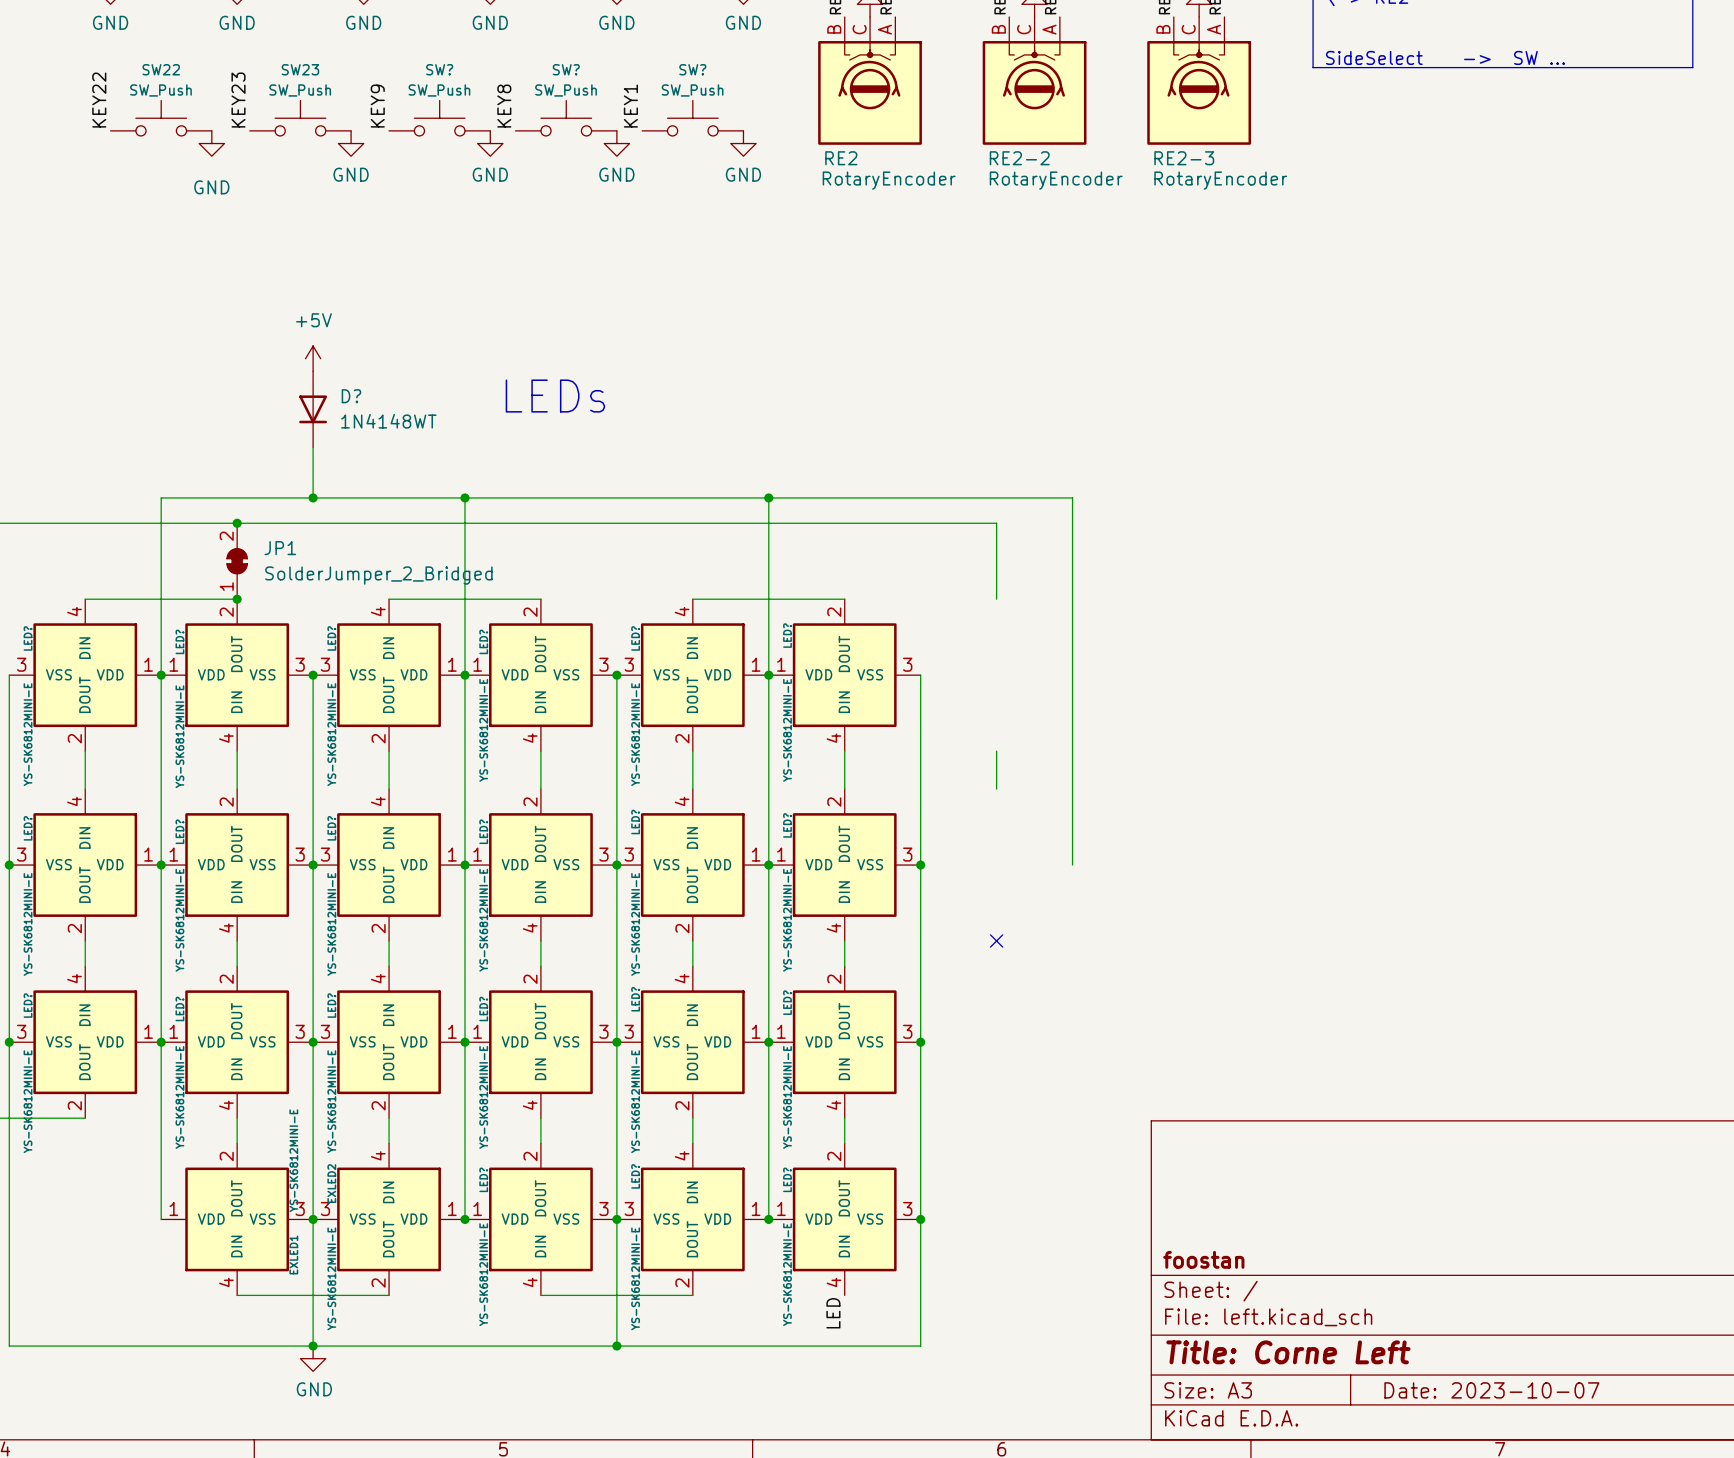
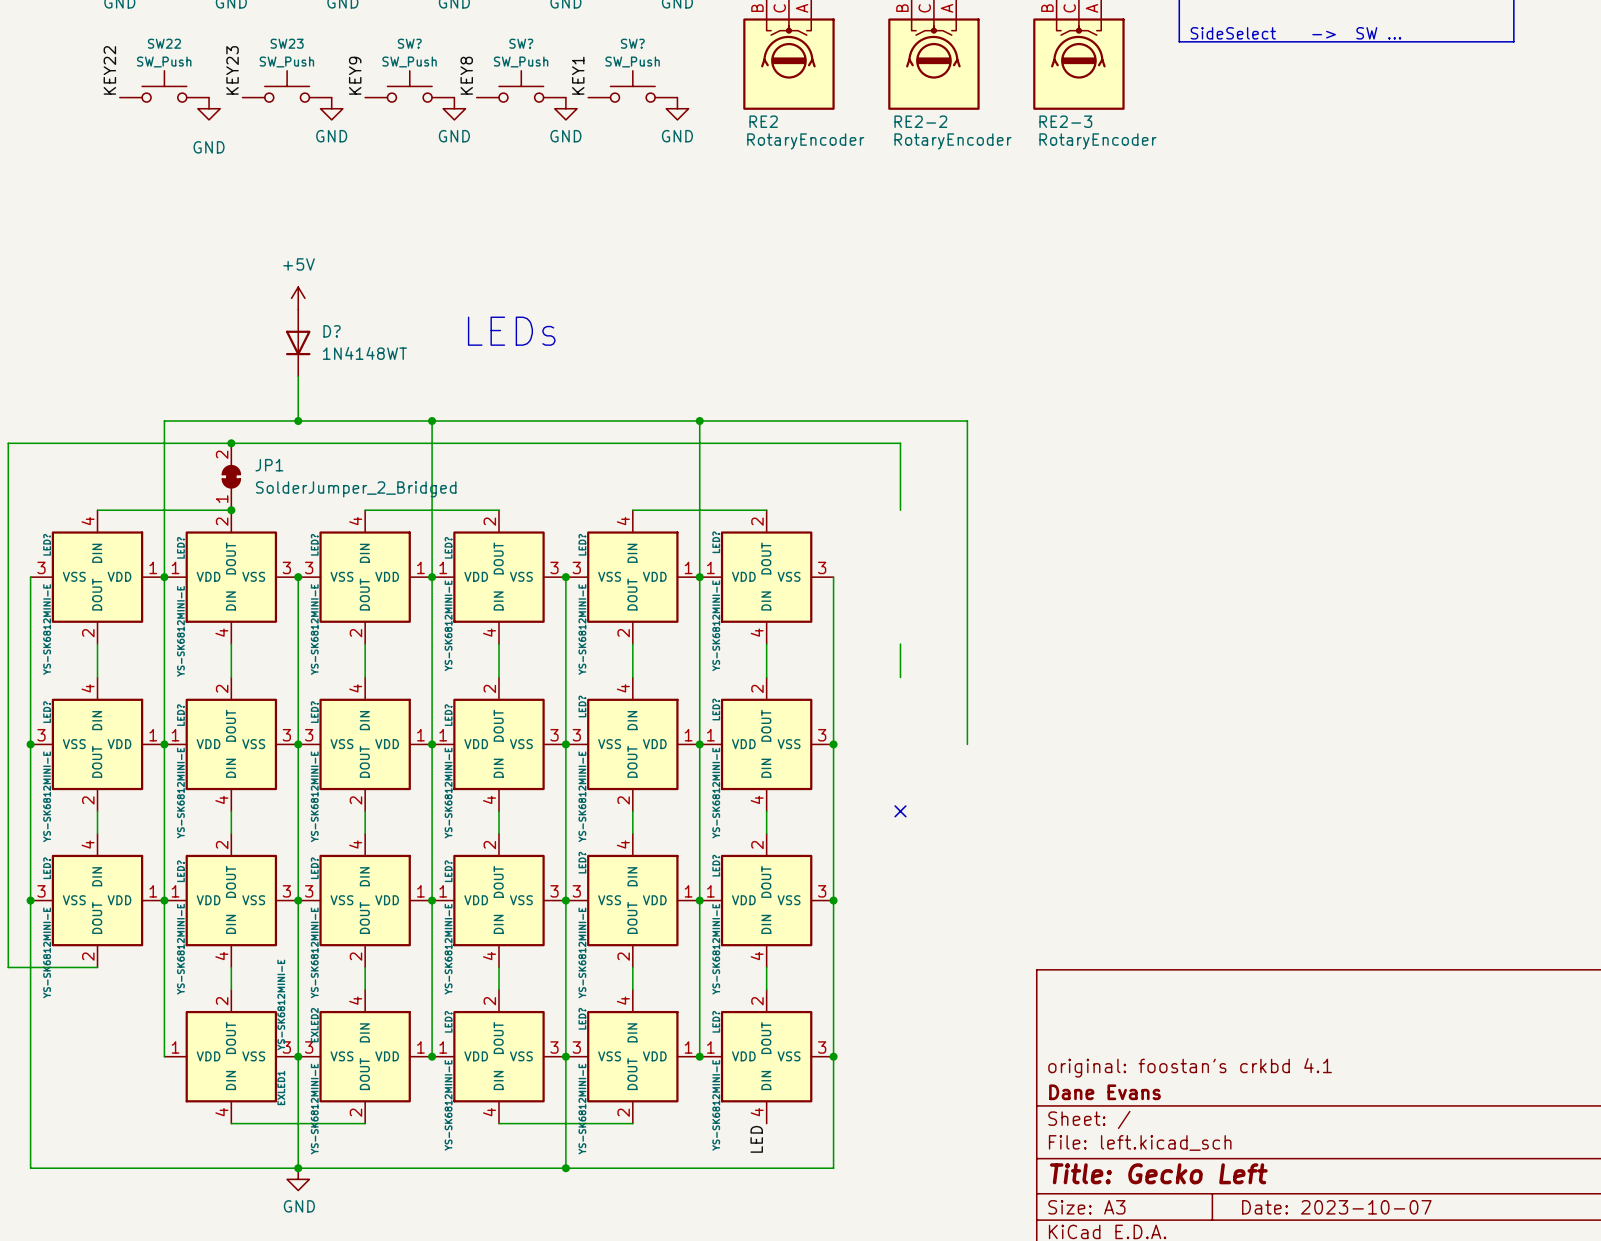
title block: none -> original: foostan's crkbd 4.1 (1190, 1067)
title block: foostan (1203, 1259) -> Dane Evans (1104, 1092)
title block: Title: Corne Left (1288, 1352) -> Title: Gecko Left (1158, 1173)

